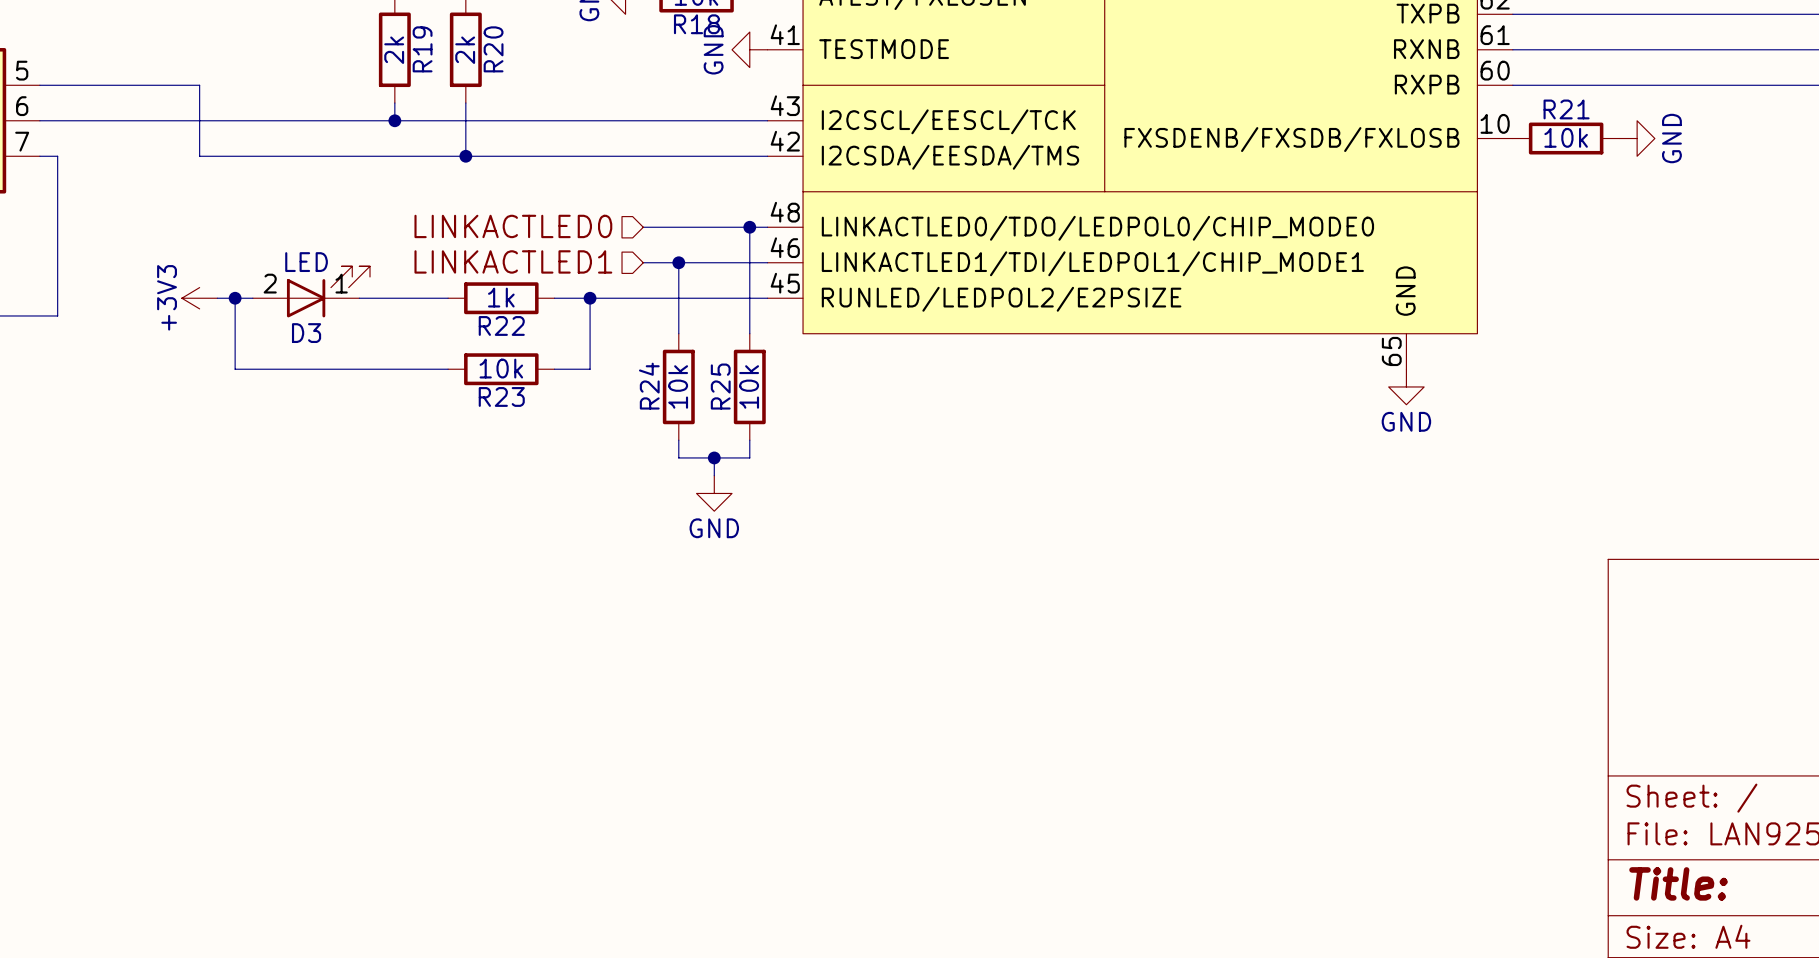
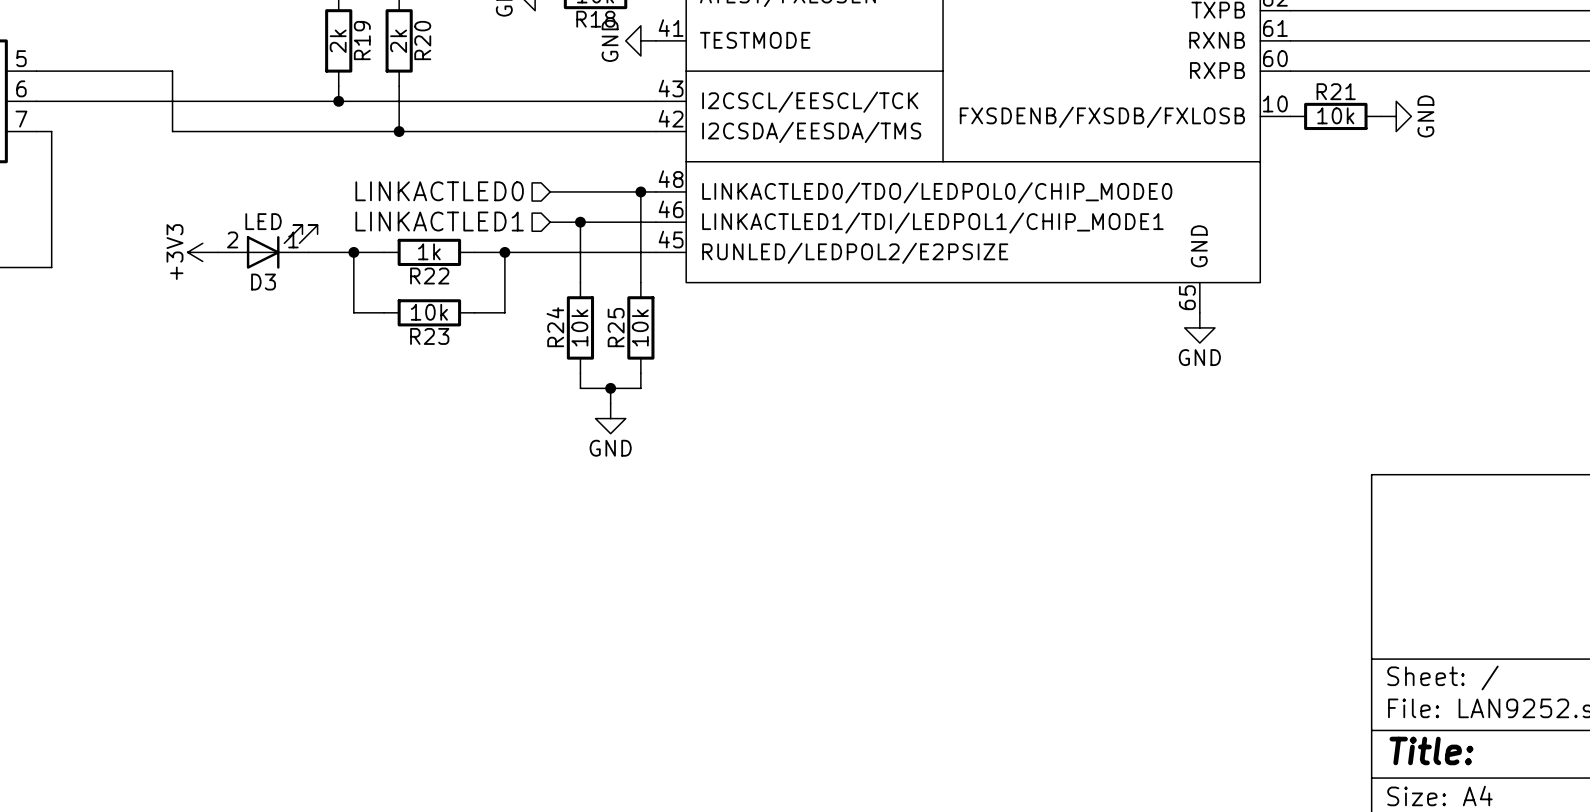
power symbol position: +3V3 (199, 298) -> +3V3 (202, 252)
wire: (235, 298) (235, 369) (412, 369) -> (353, 252) (353, 312)
junction: (235, 298) -> none
junction: none -> (353, 252)

